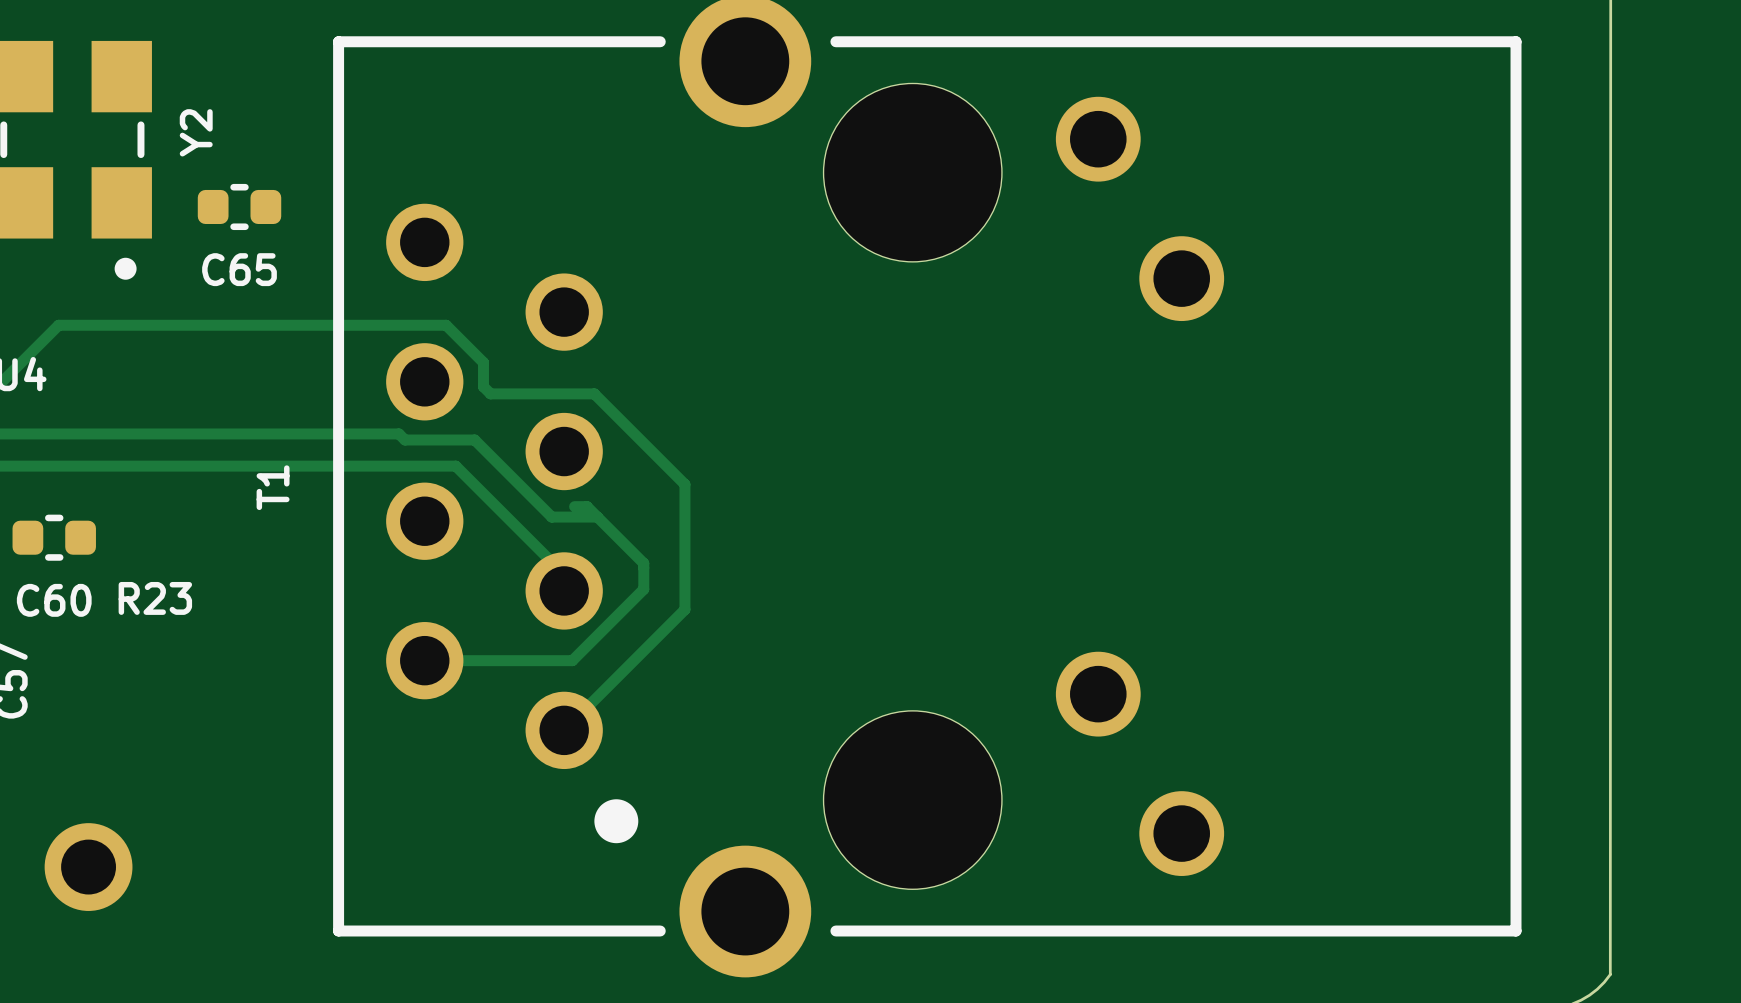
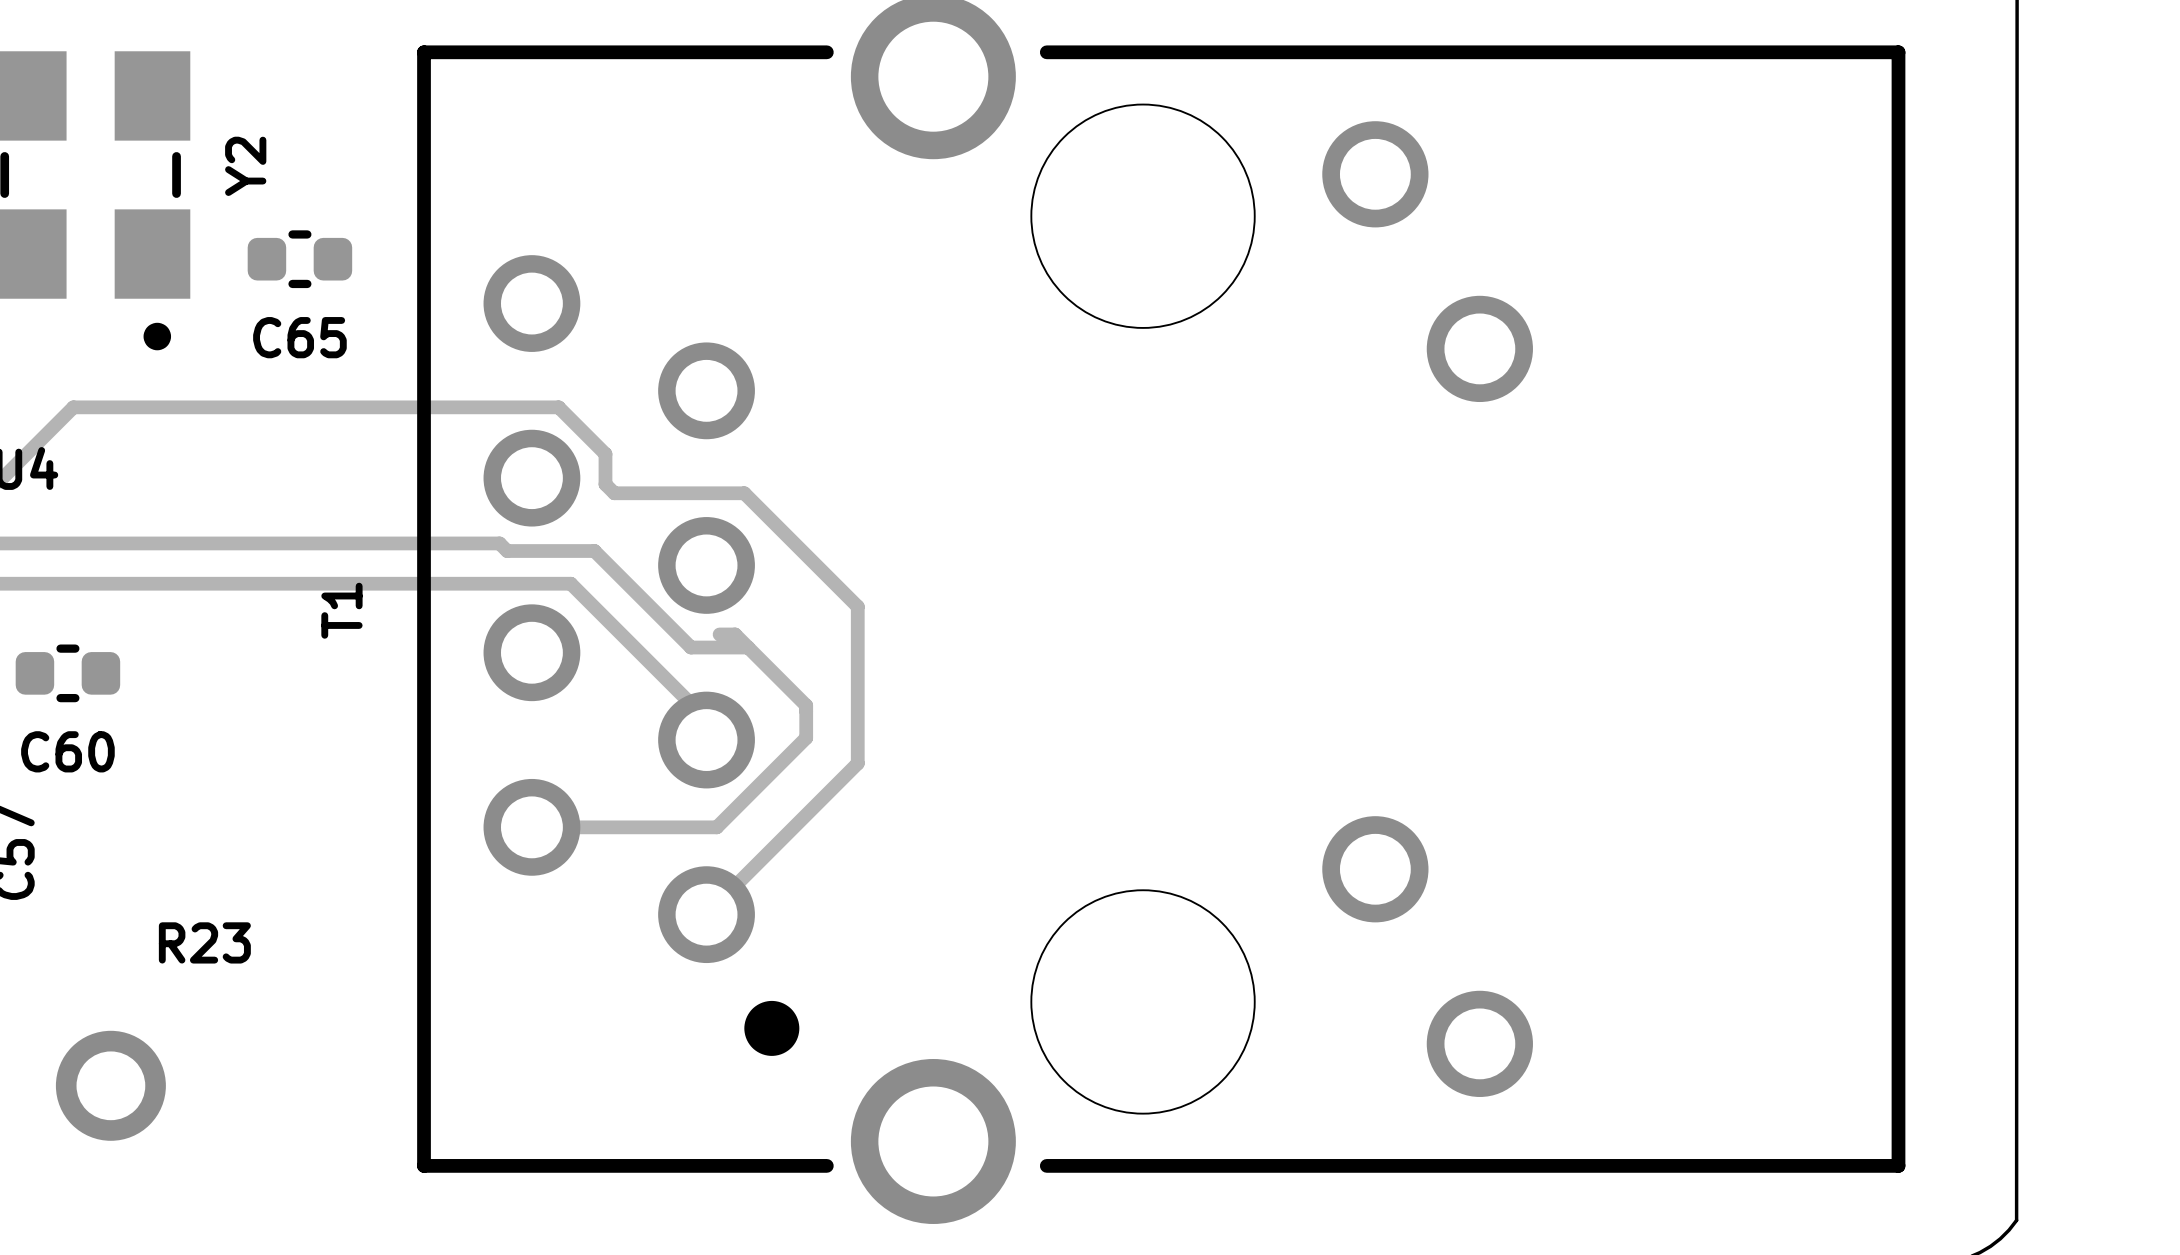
R23 position: (155, 598) -> (204, 942)

